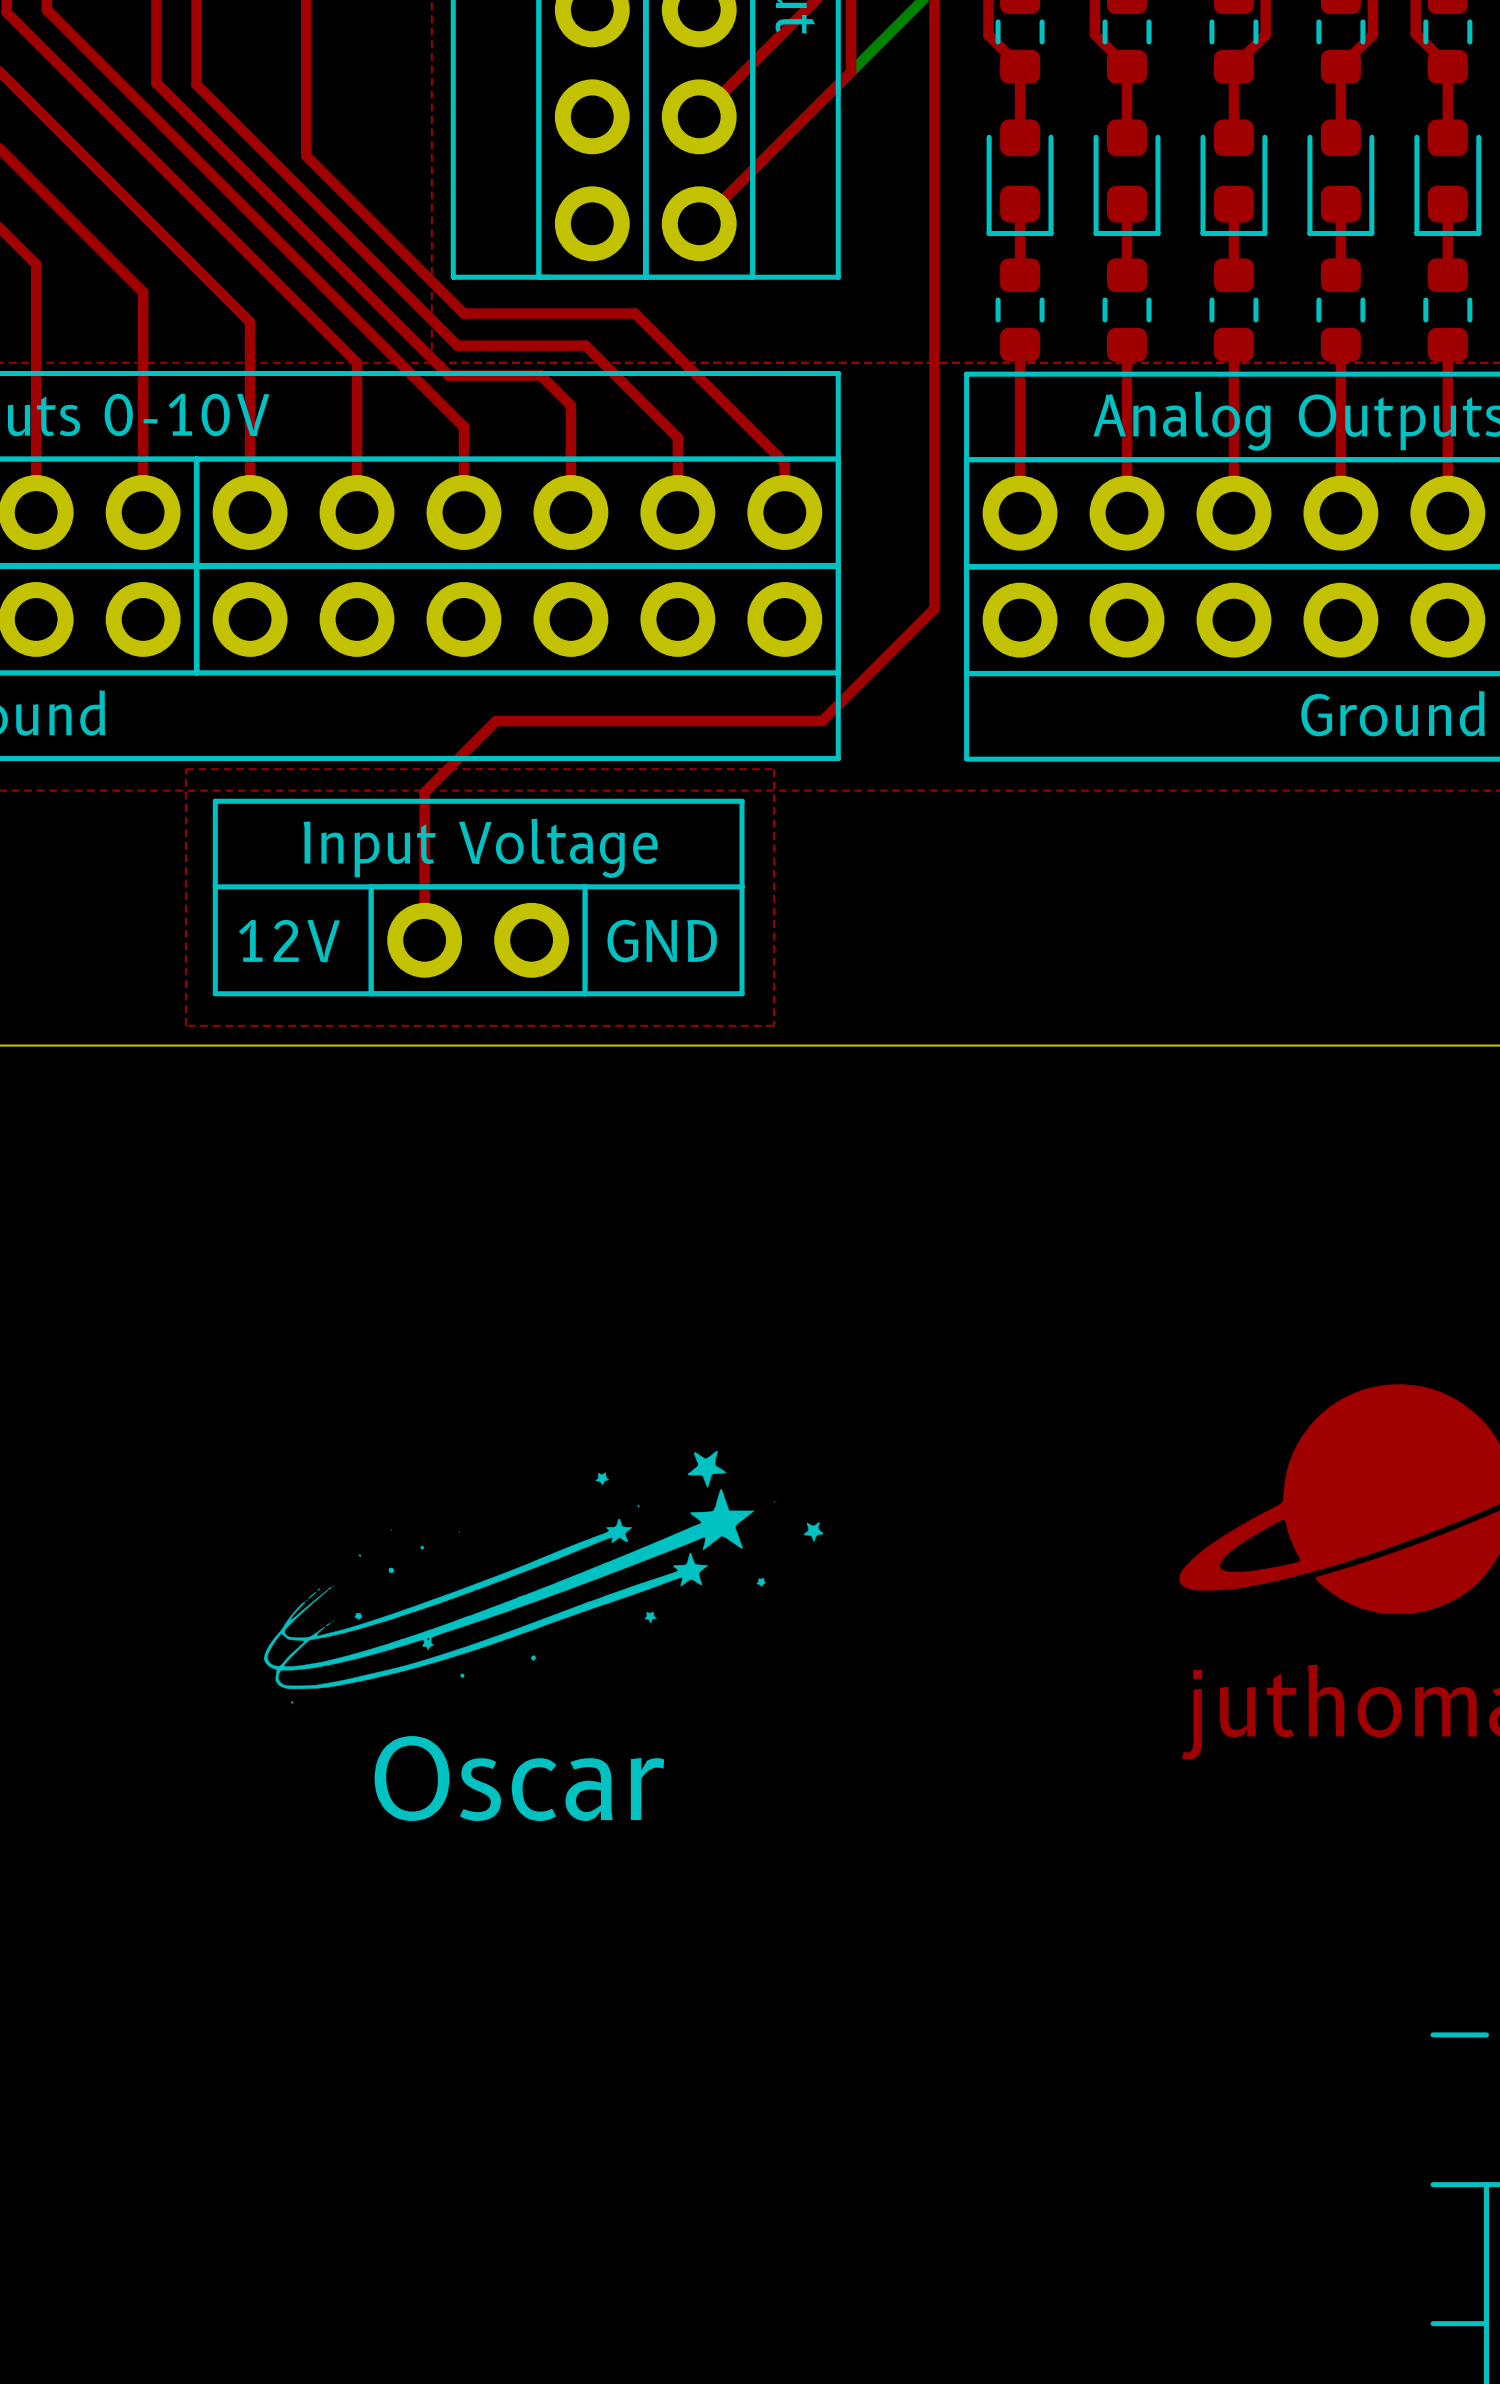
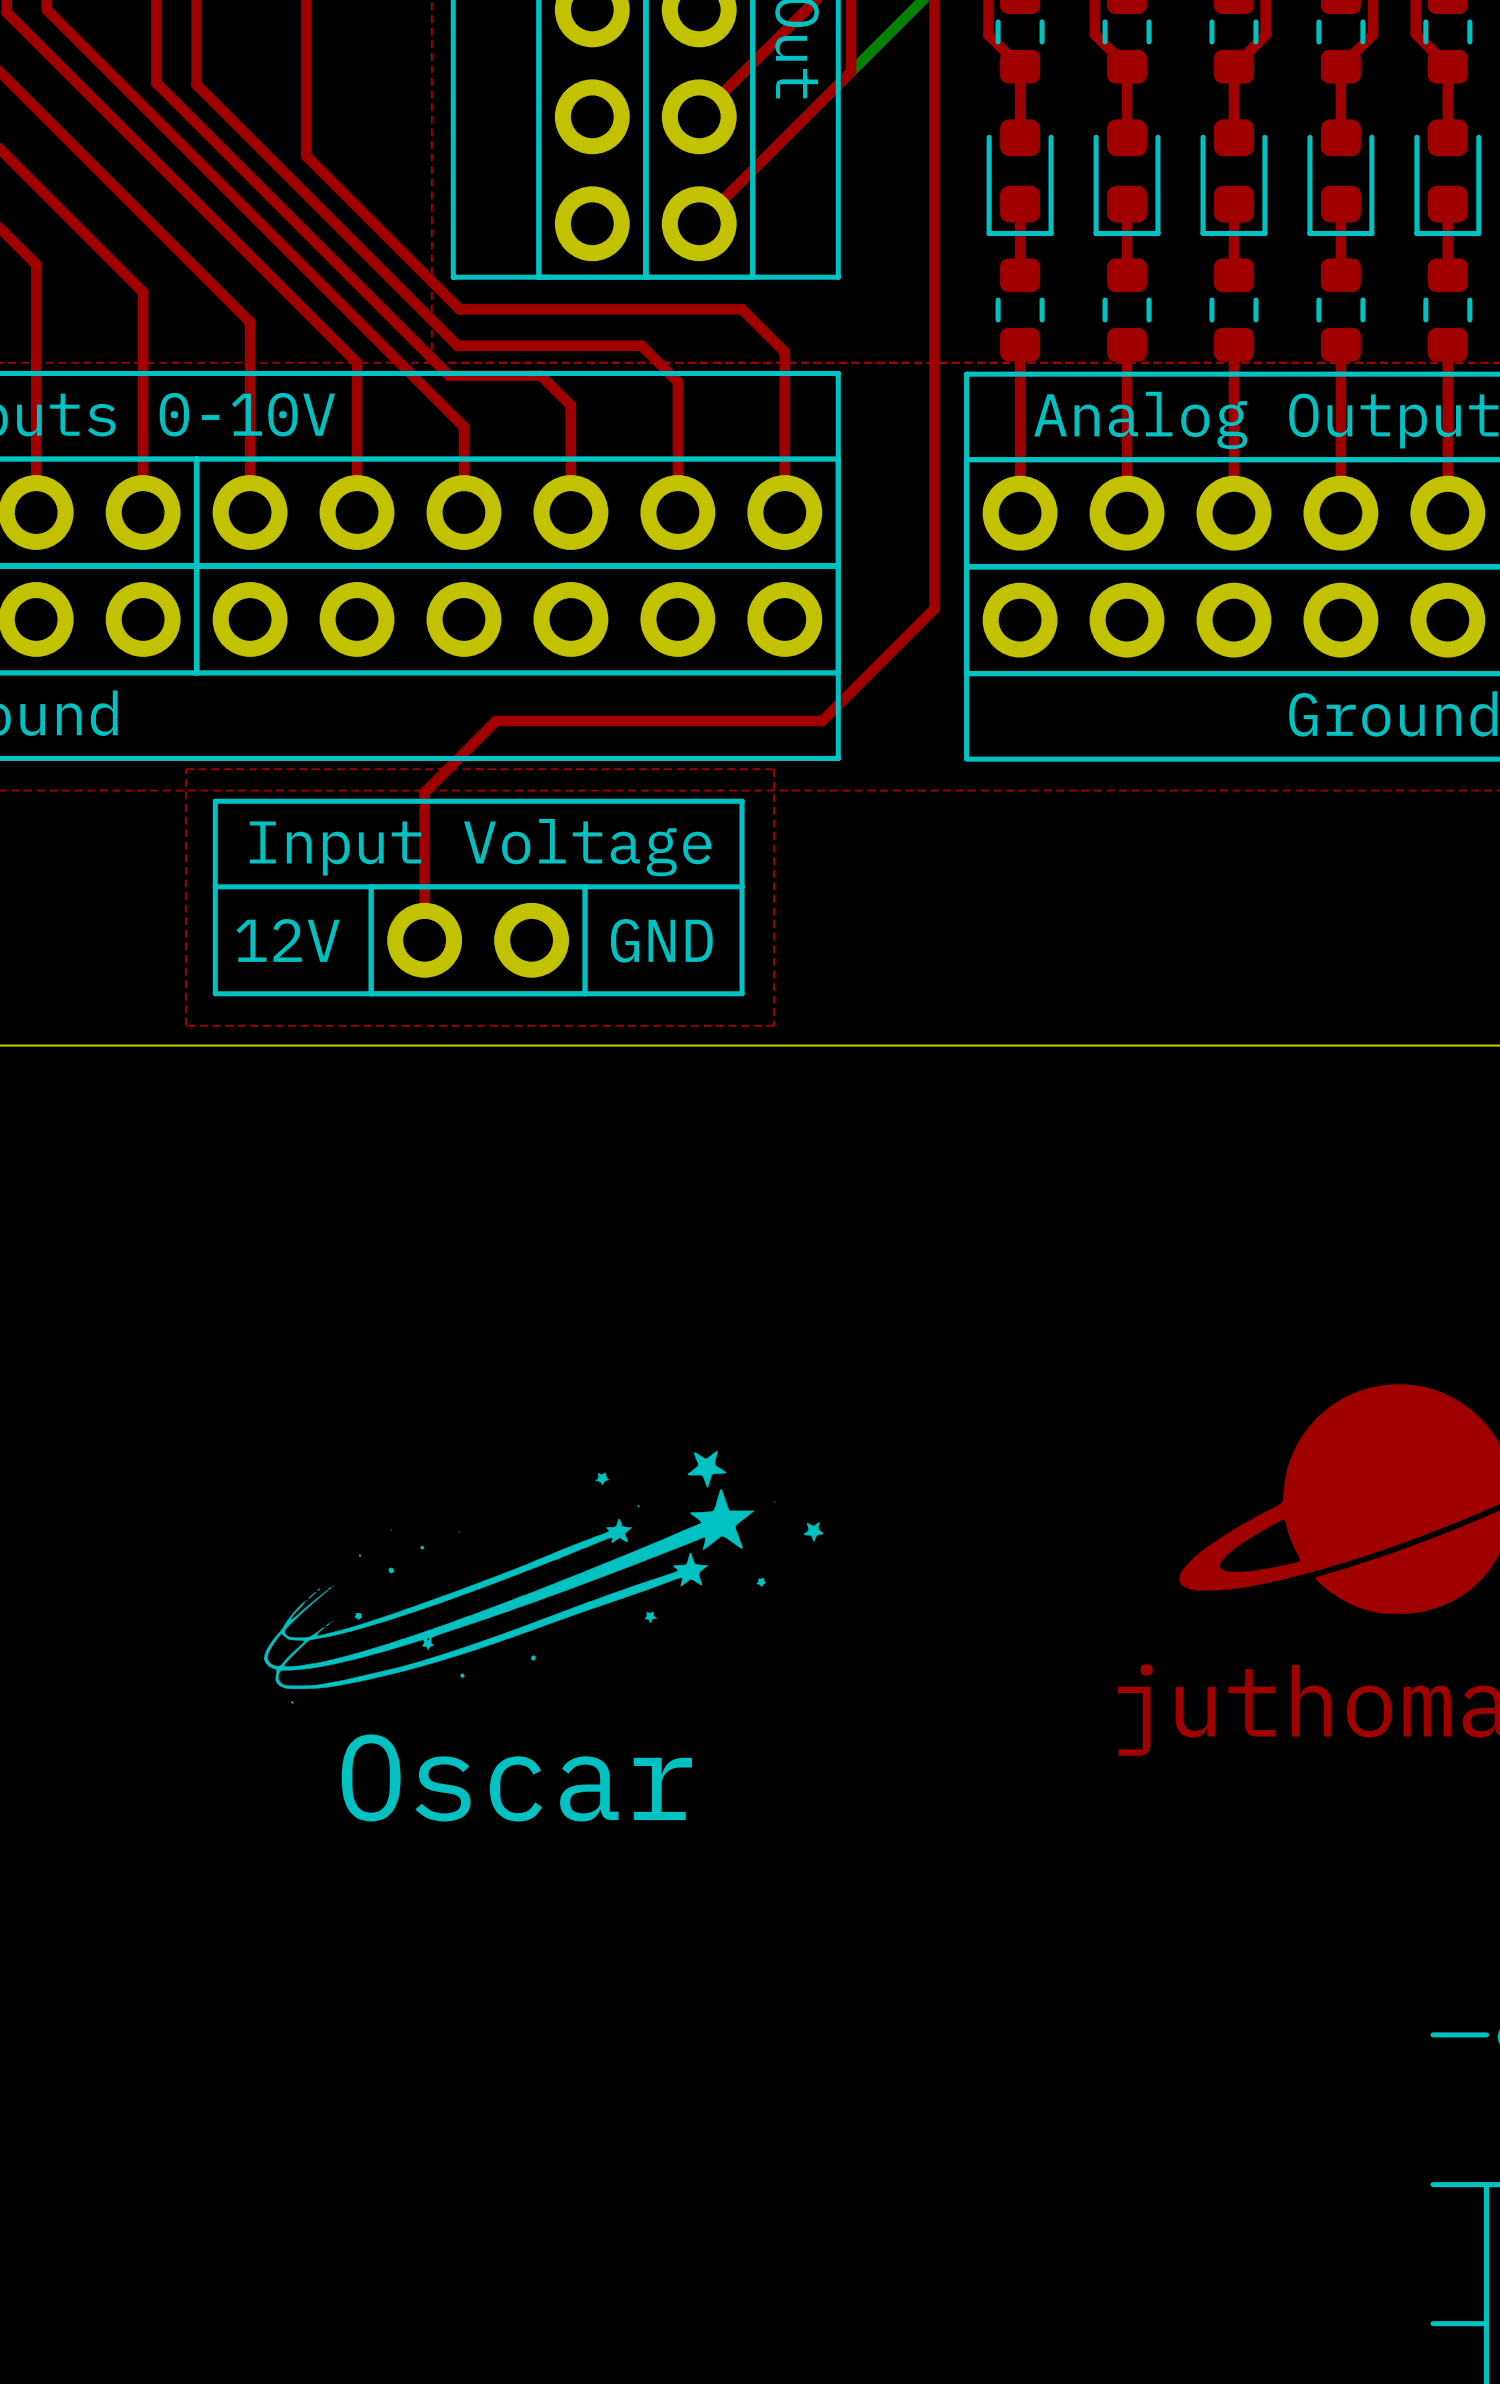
top track: (459, 309) (463, 313) (635, 313) (784, 463) -> (459, 309) (742, 309) (784, 352) (784, 463)
top track: (585, 345) (677, 437) -> (585, 345) (641, 345) (677, 382) (677, 437)

